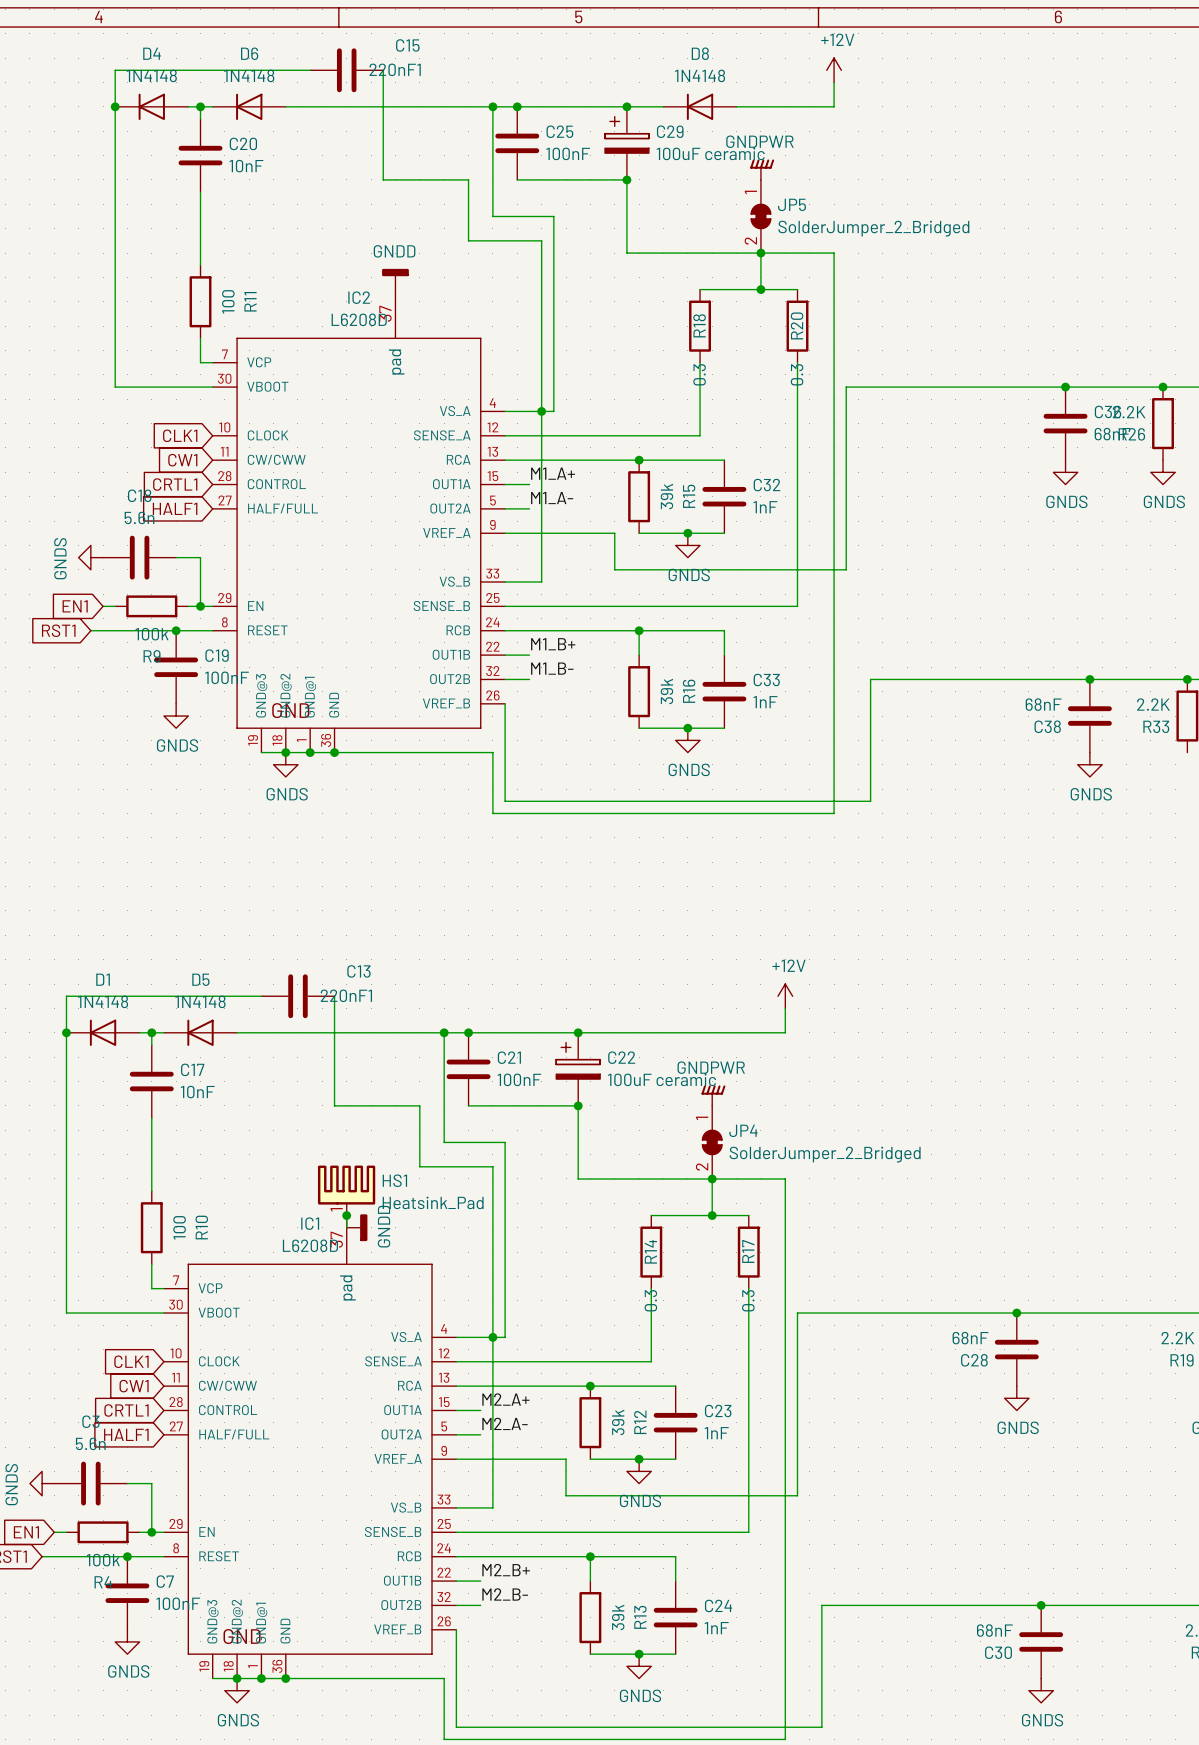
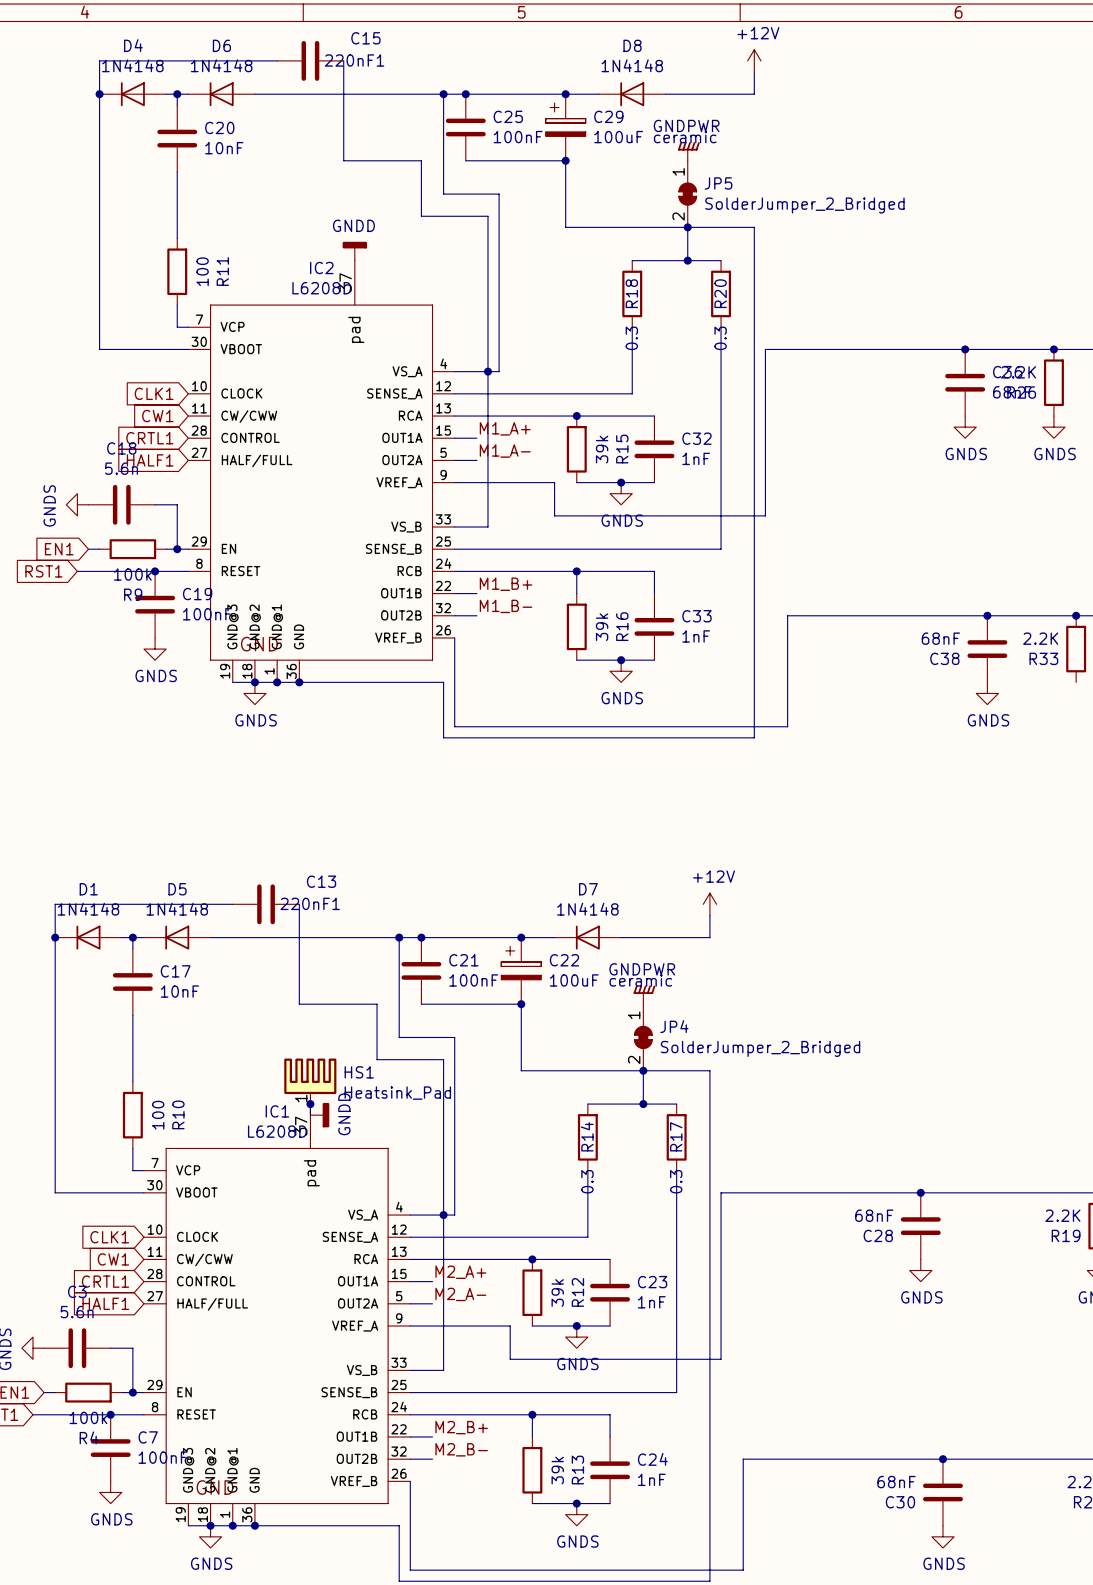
D7: none -> 1N4148 (587, 937)

